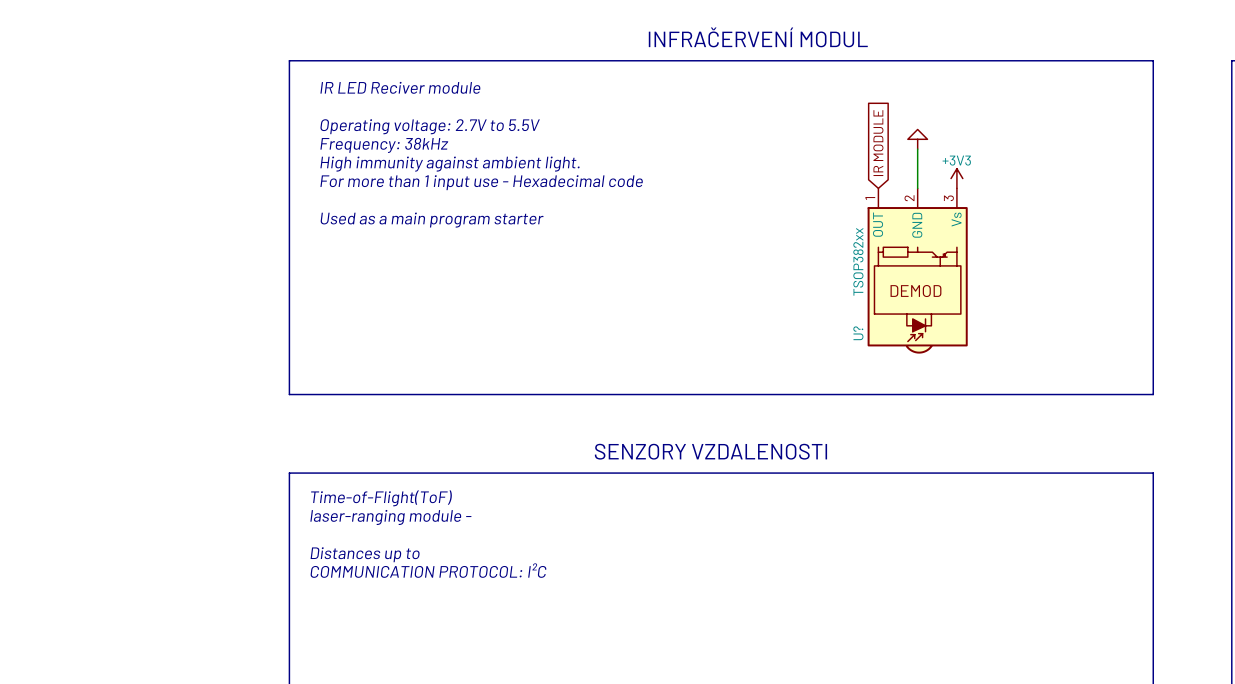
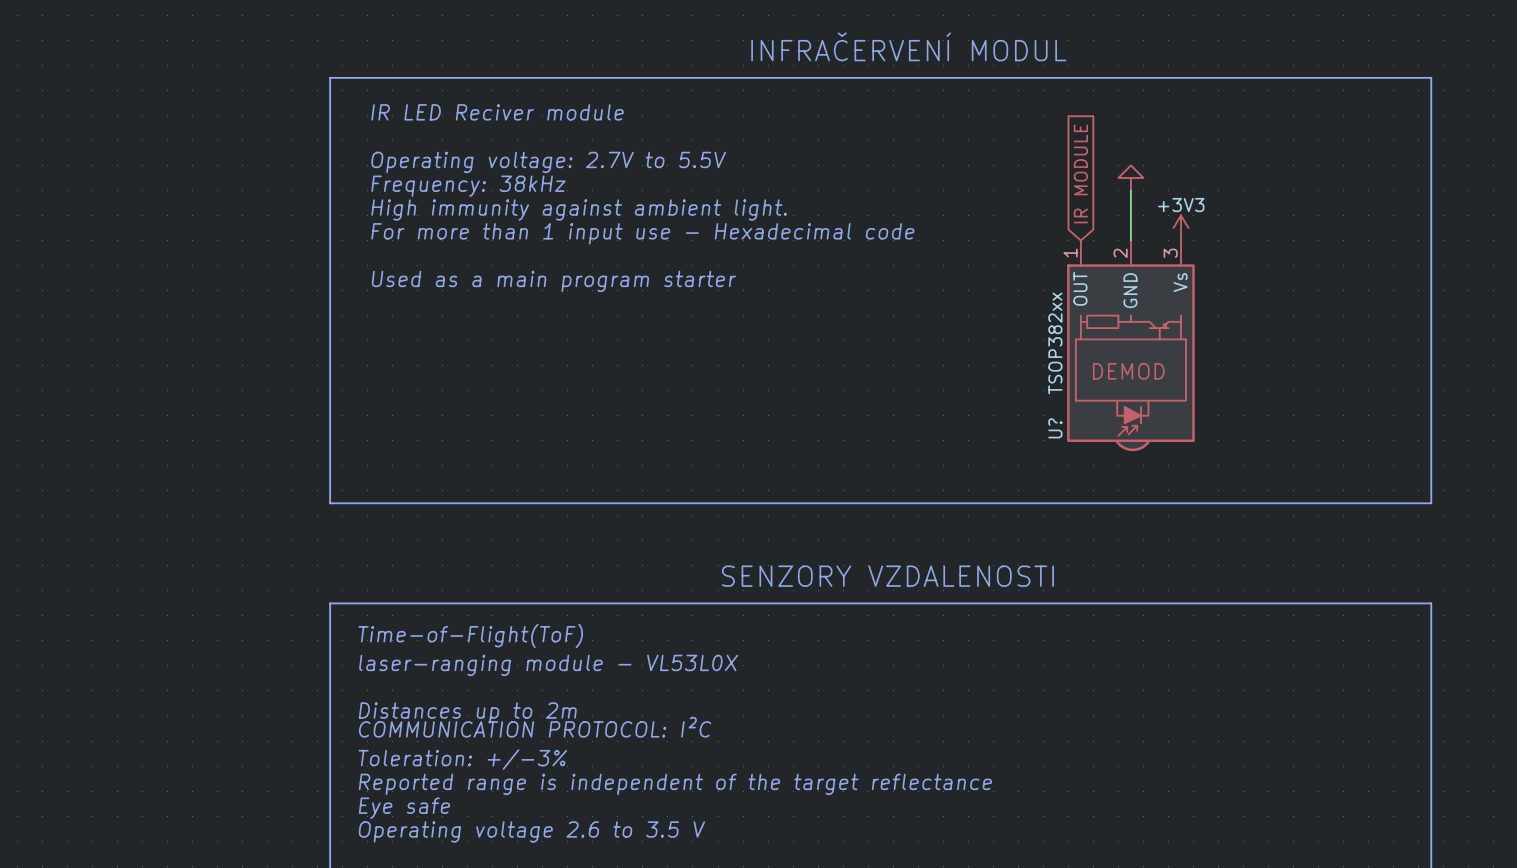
text: laser-ranging module - (390, 517) -> laser-ranging module - VL53L0X (548, 665)
text: Distances up to (365, 554) -> Distances up to 2m (467, 712)
text: none -> Toleration: +/-3% (462, 759)
text: none -> Reported range is independent of the target reflectance (675, 784)
text: none -> Eye safe (404, 808)
text: none -> Operating voltage 2.6 to 3.5 V (531, 831)

